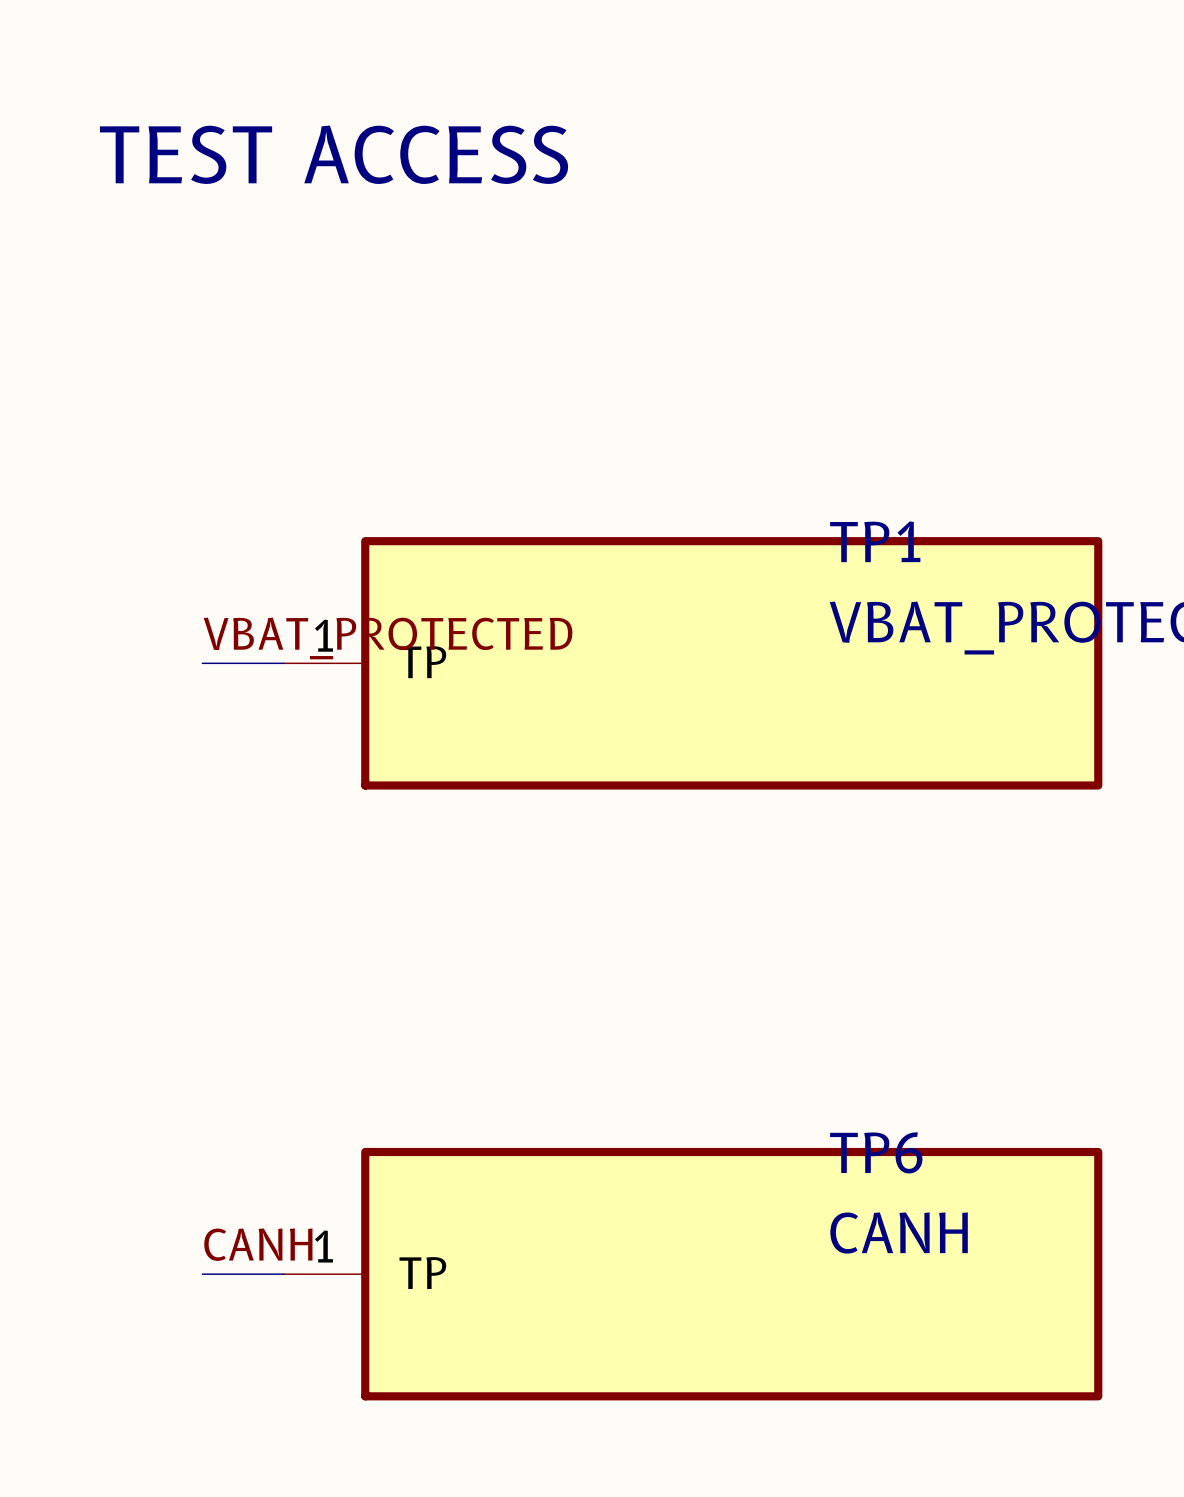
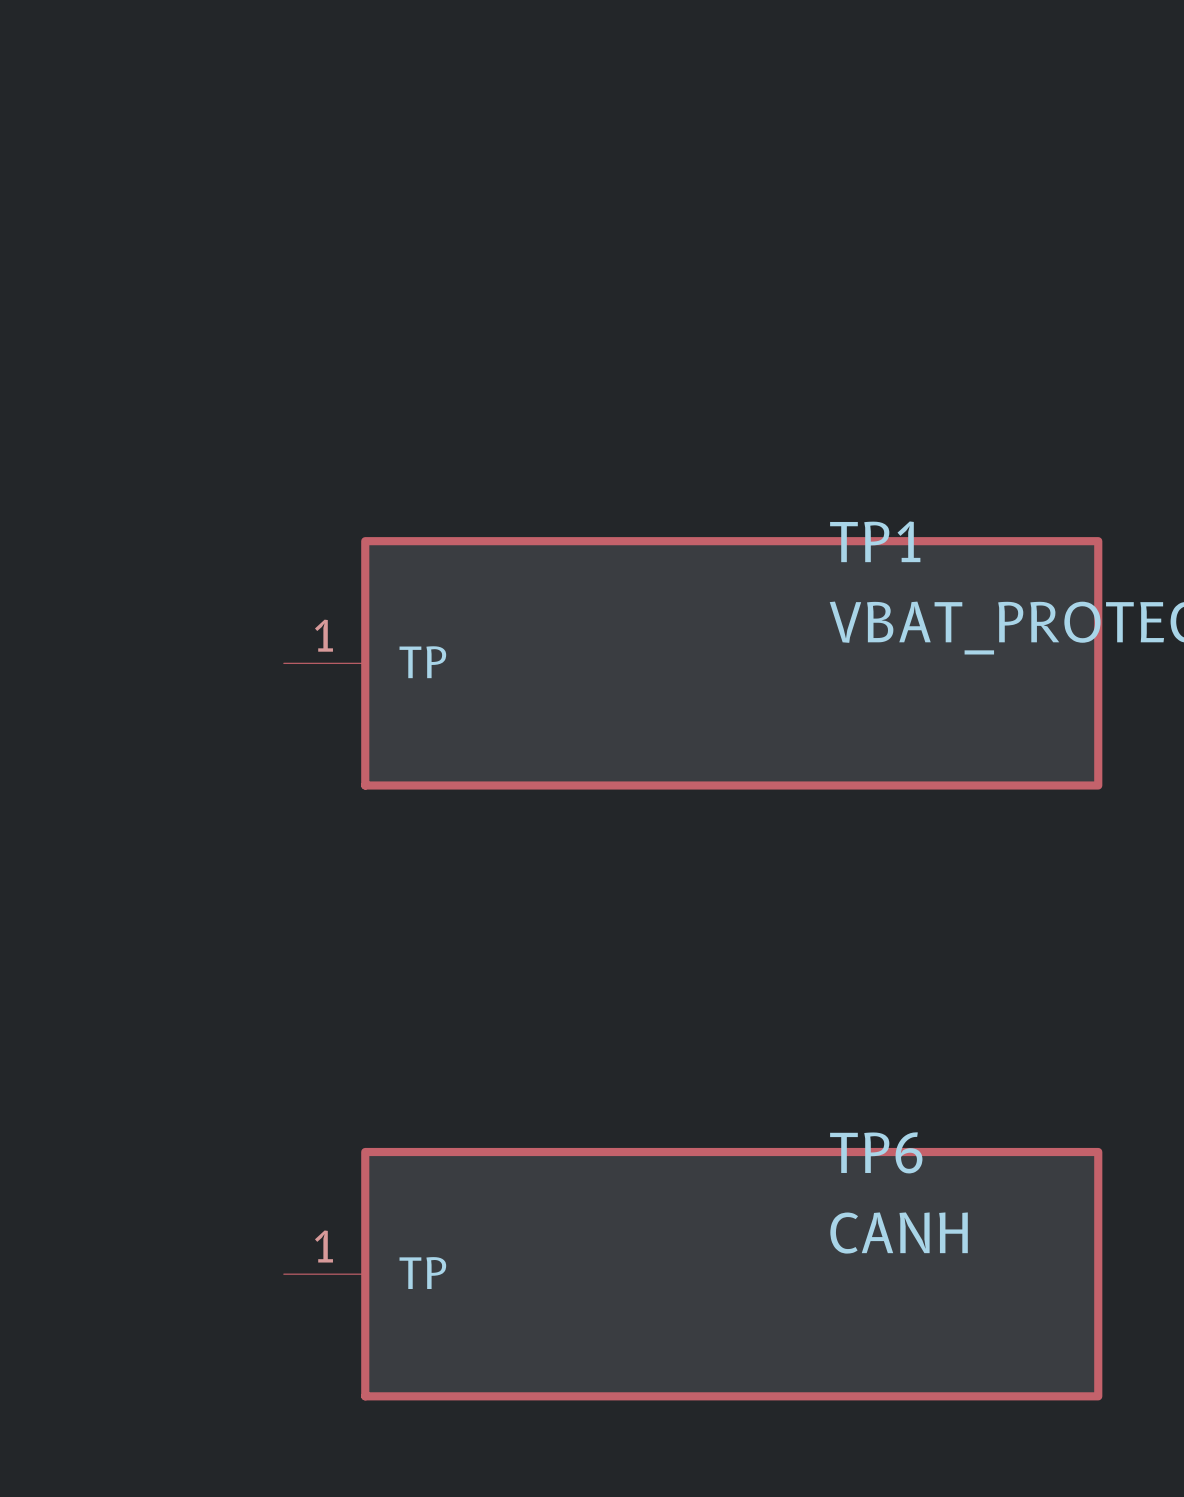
text: TEST ACCESS (333, 154) -> none
label: VBAT_PROTECTED (388, 638) -> none
wire: (202, 663) (283, 663) -> none
label: CANH (258, 1244) -> none
wire: (202, 1274) (283, 1274) -> none

